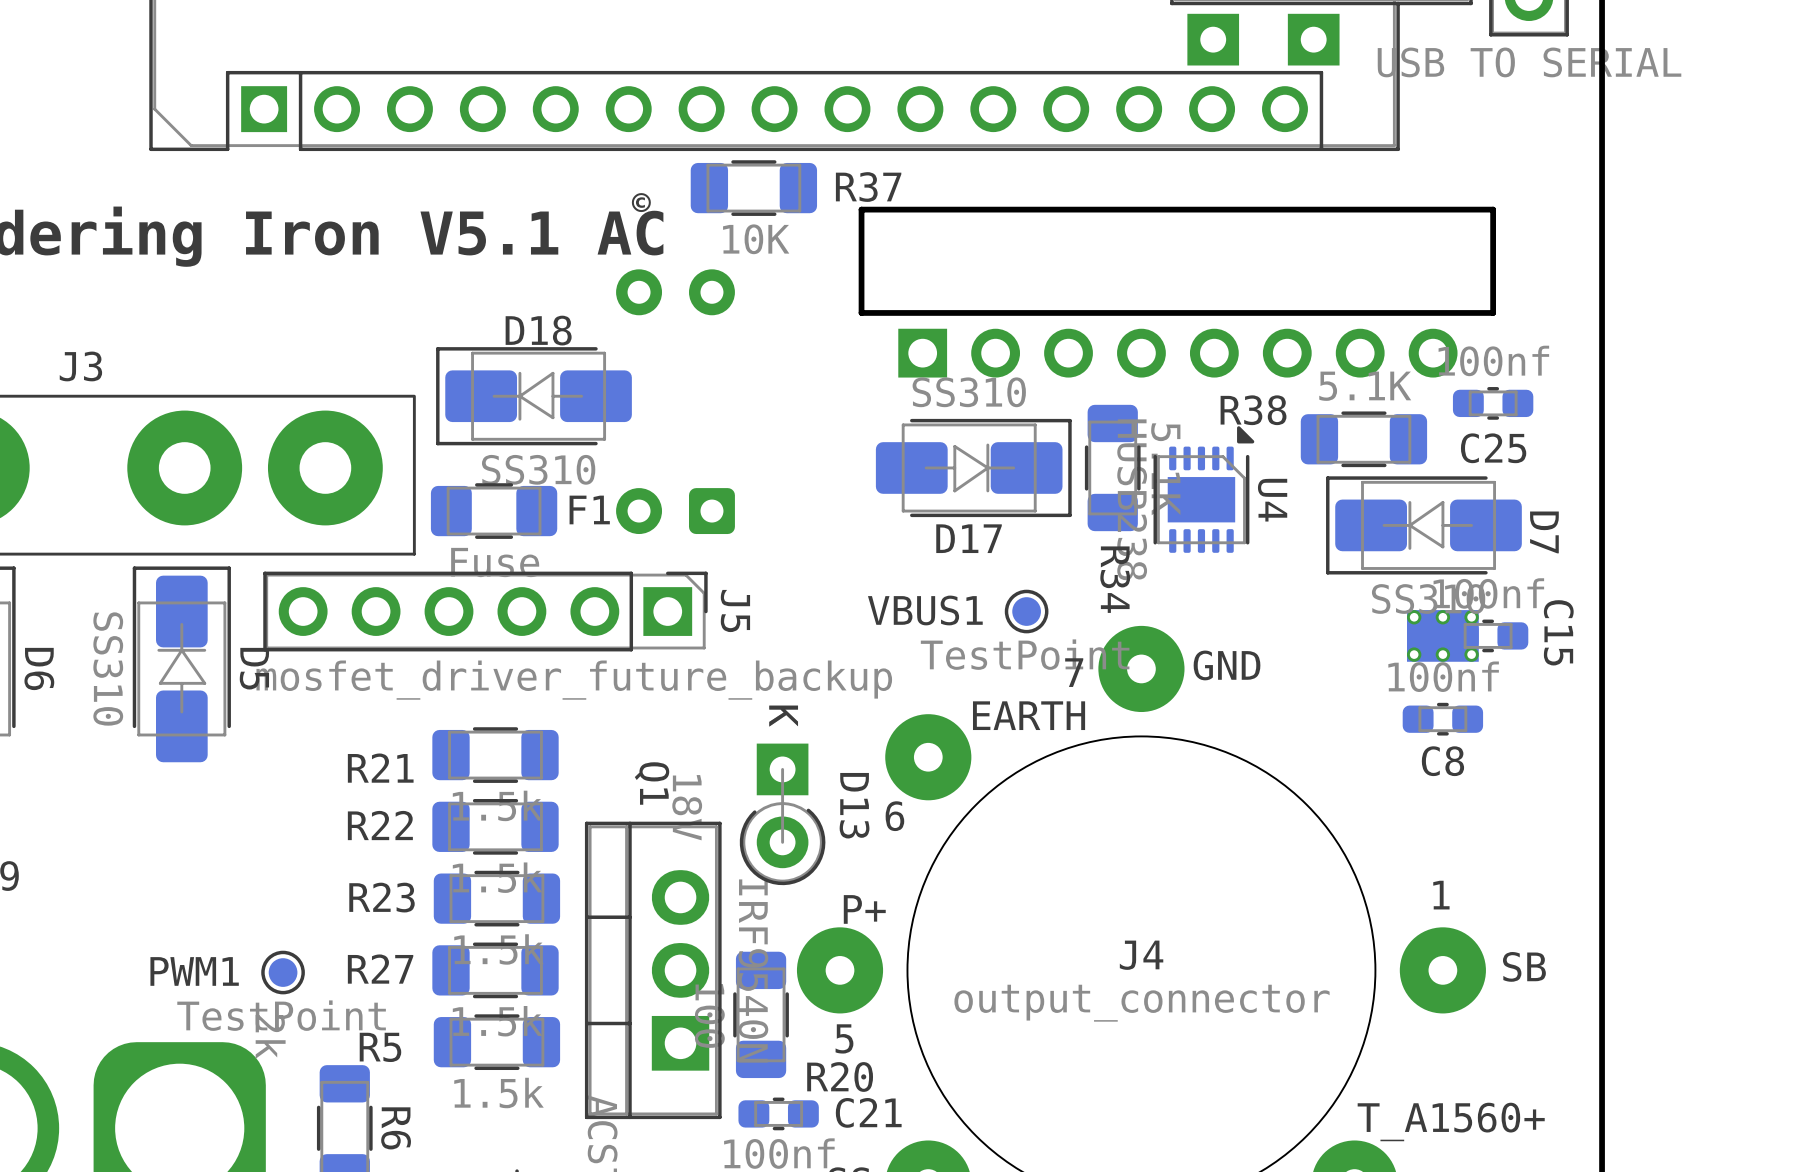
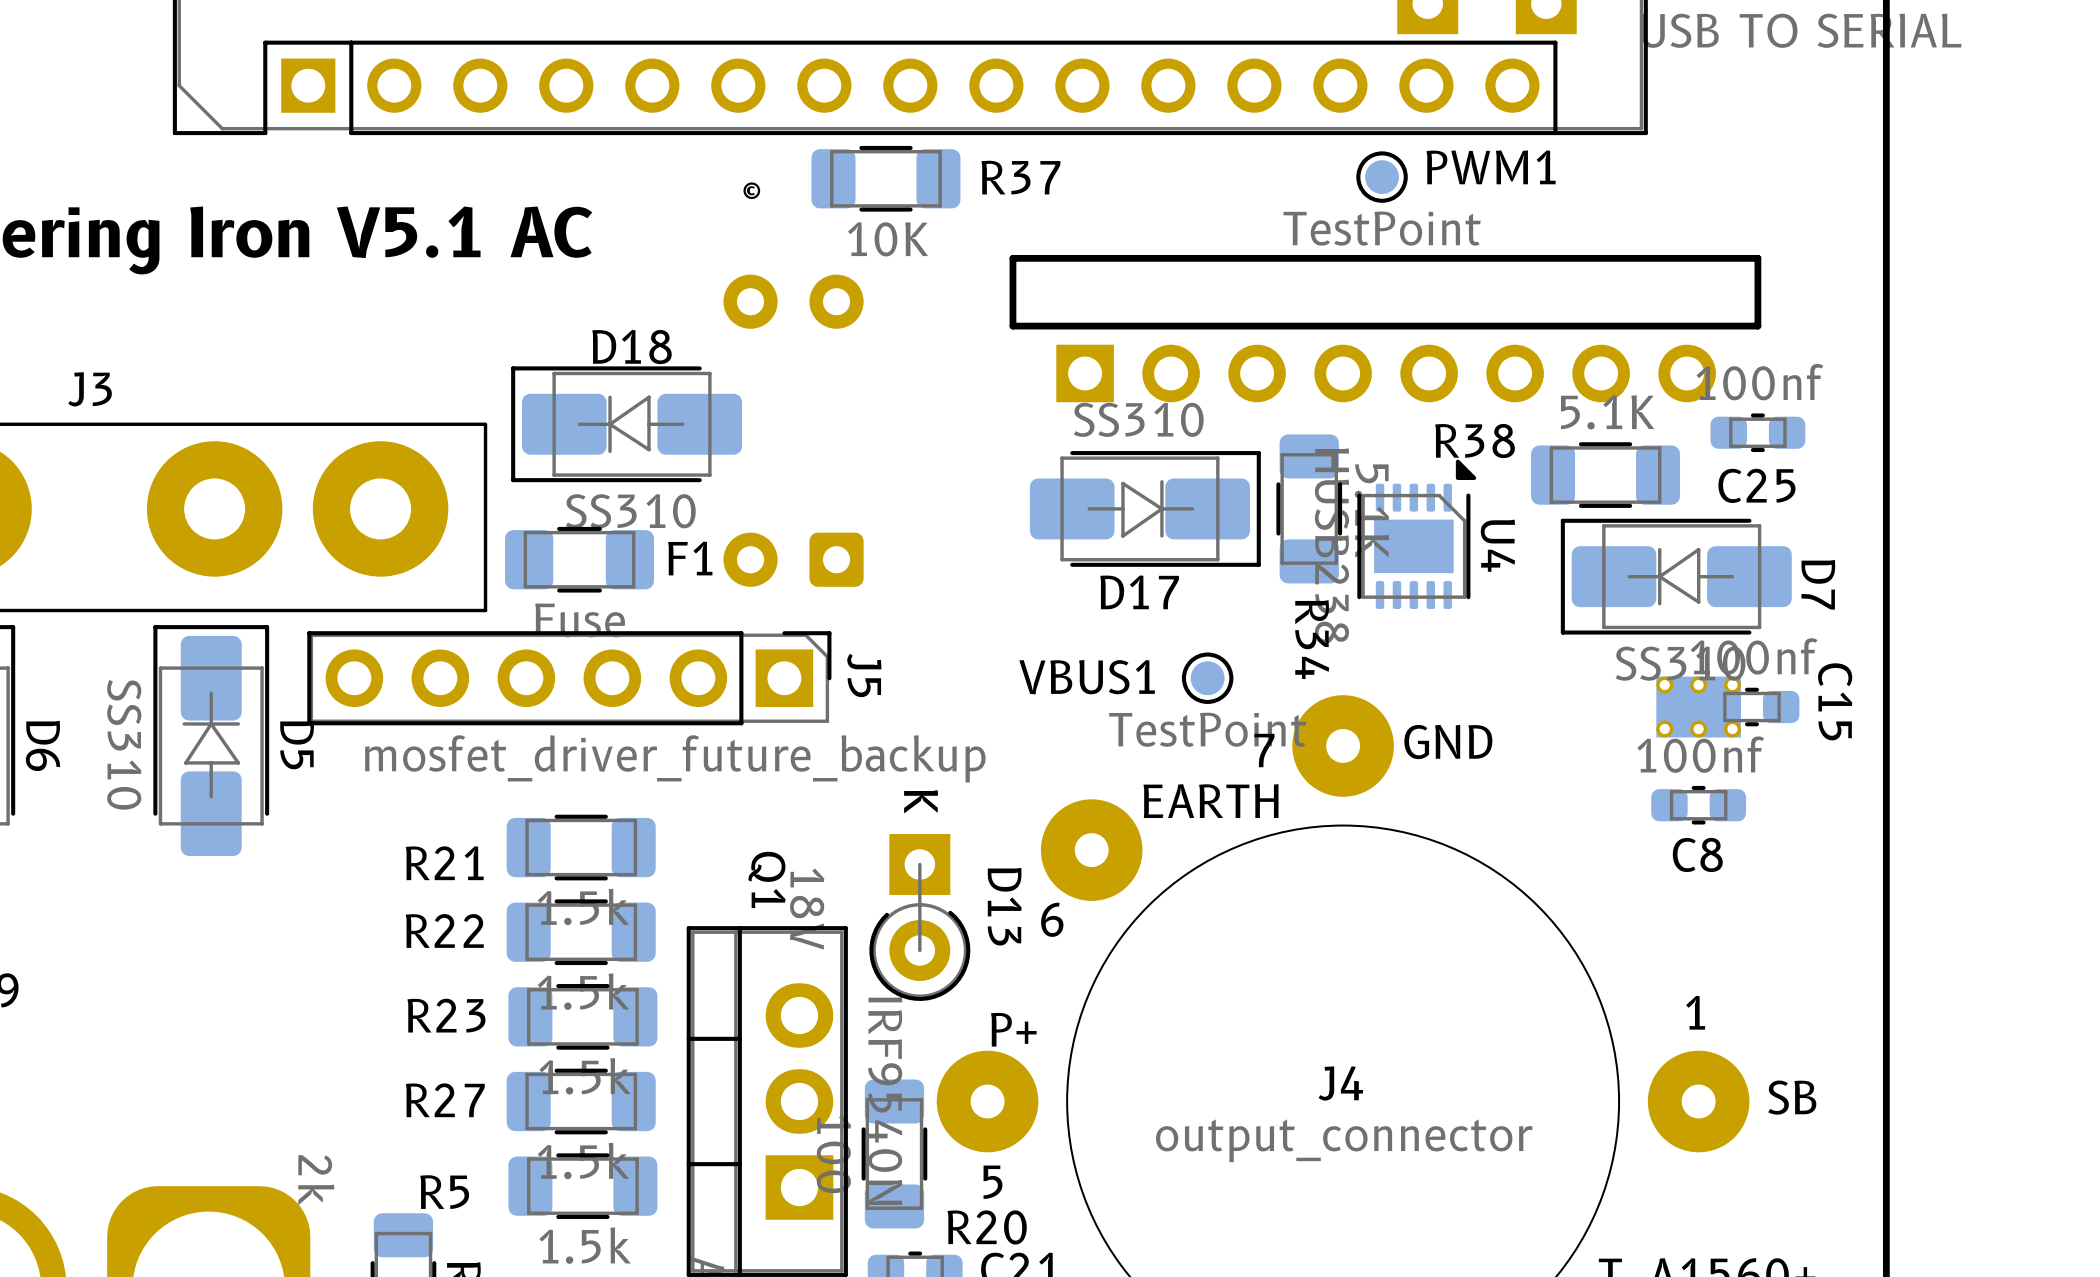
board edge: (1493, 255) (1493, 209) (861, 209) (861, 255) -> (1757, 258) (1012, 258)
PWM1 name position: PWM1 (194, 971) -> PWM1 (1491, 167)
PWM1 position: (283, 972) -> (1382, 177)

